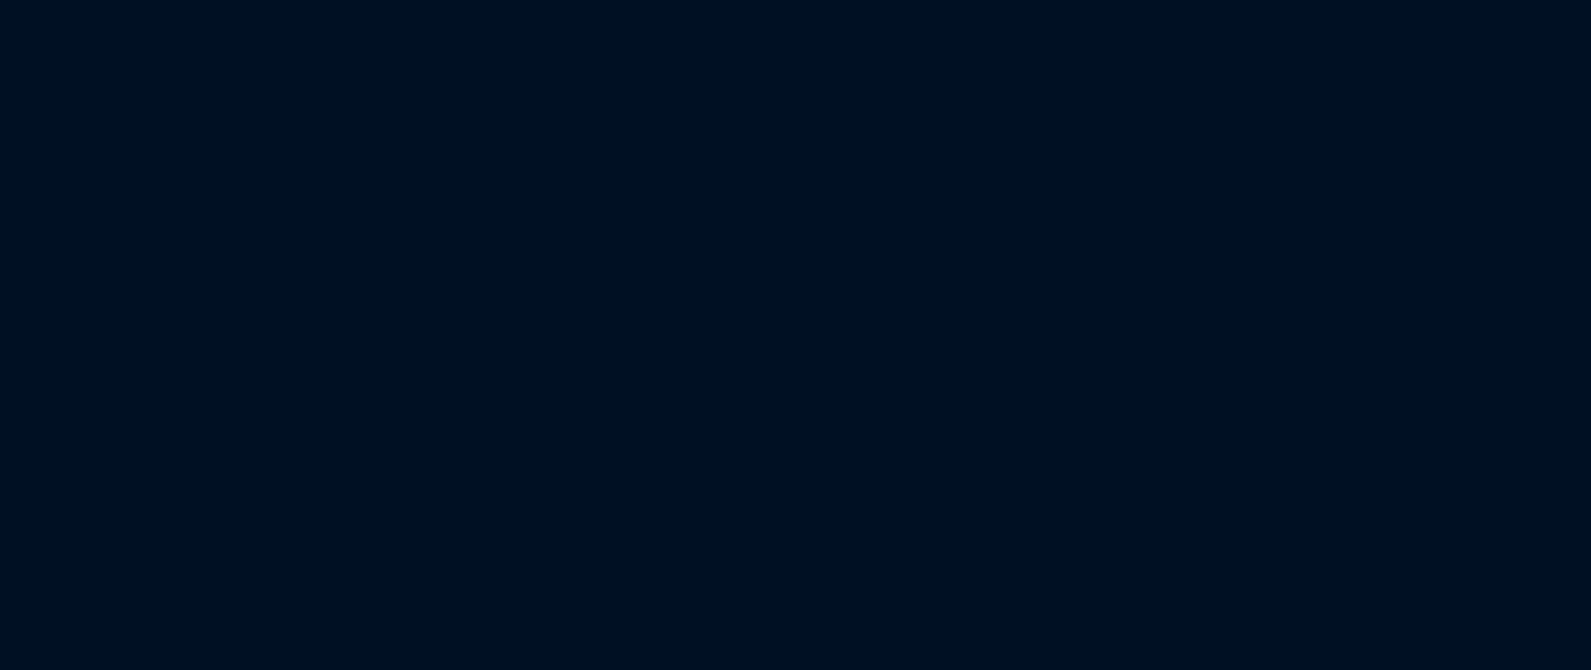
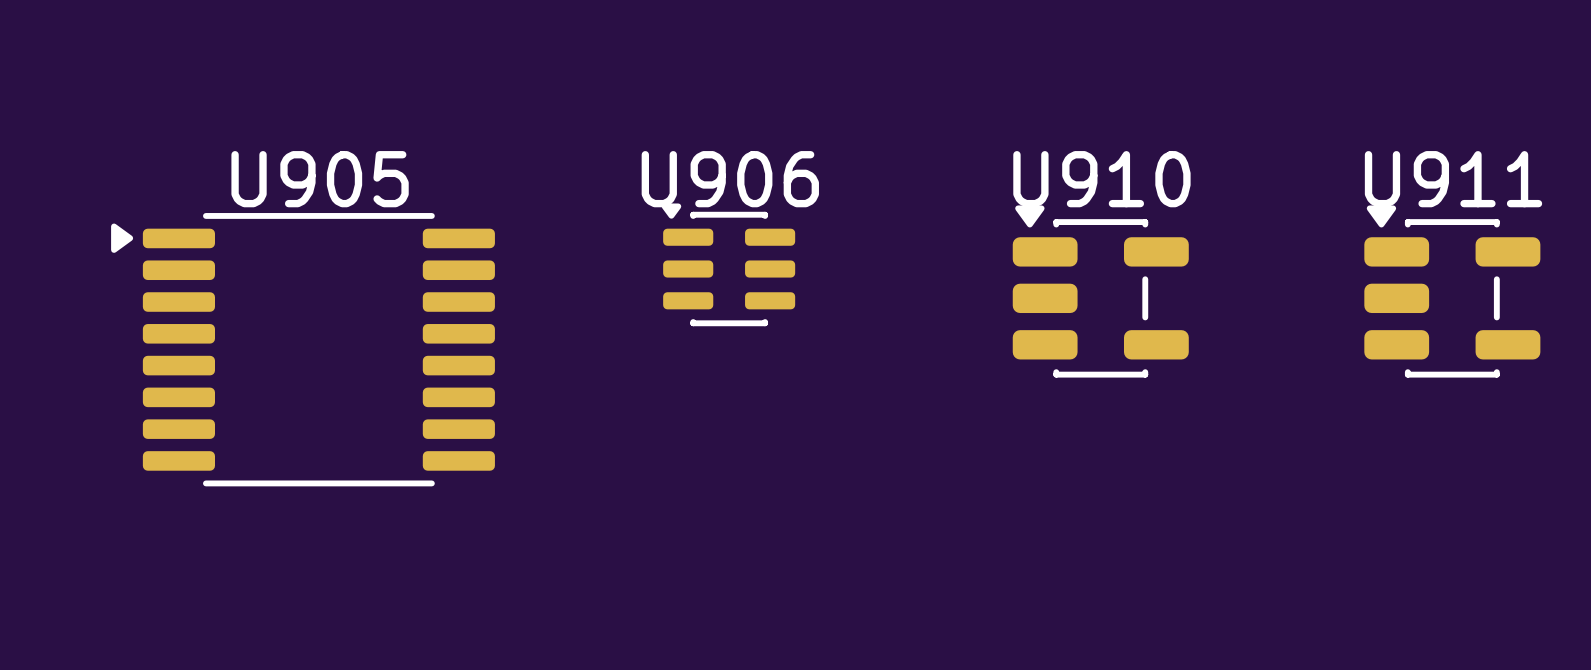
U906: none -> (728, 264)
U910: none -> (1100, 291)
U911: none -> (1452, 291)
U905: none -> (303, 349)

